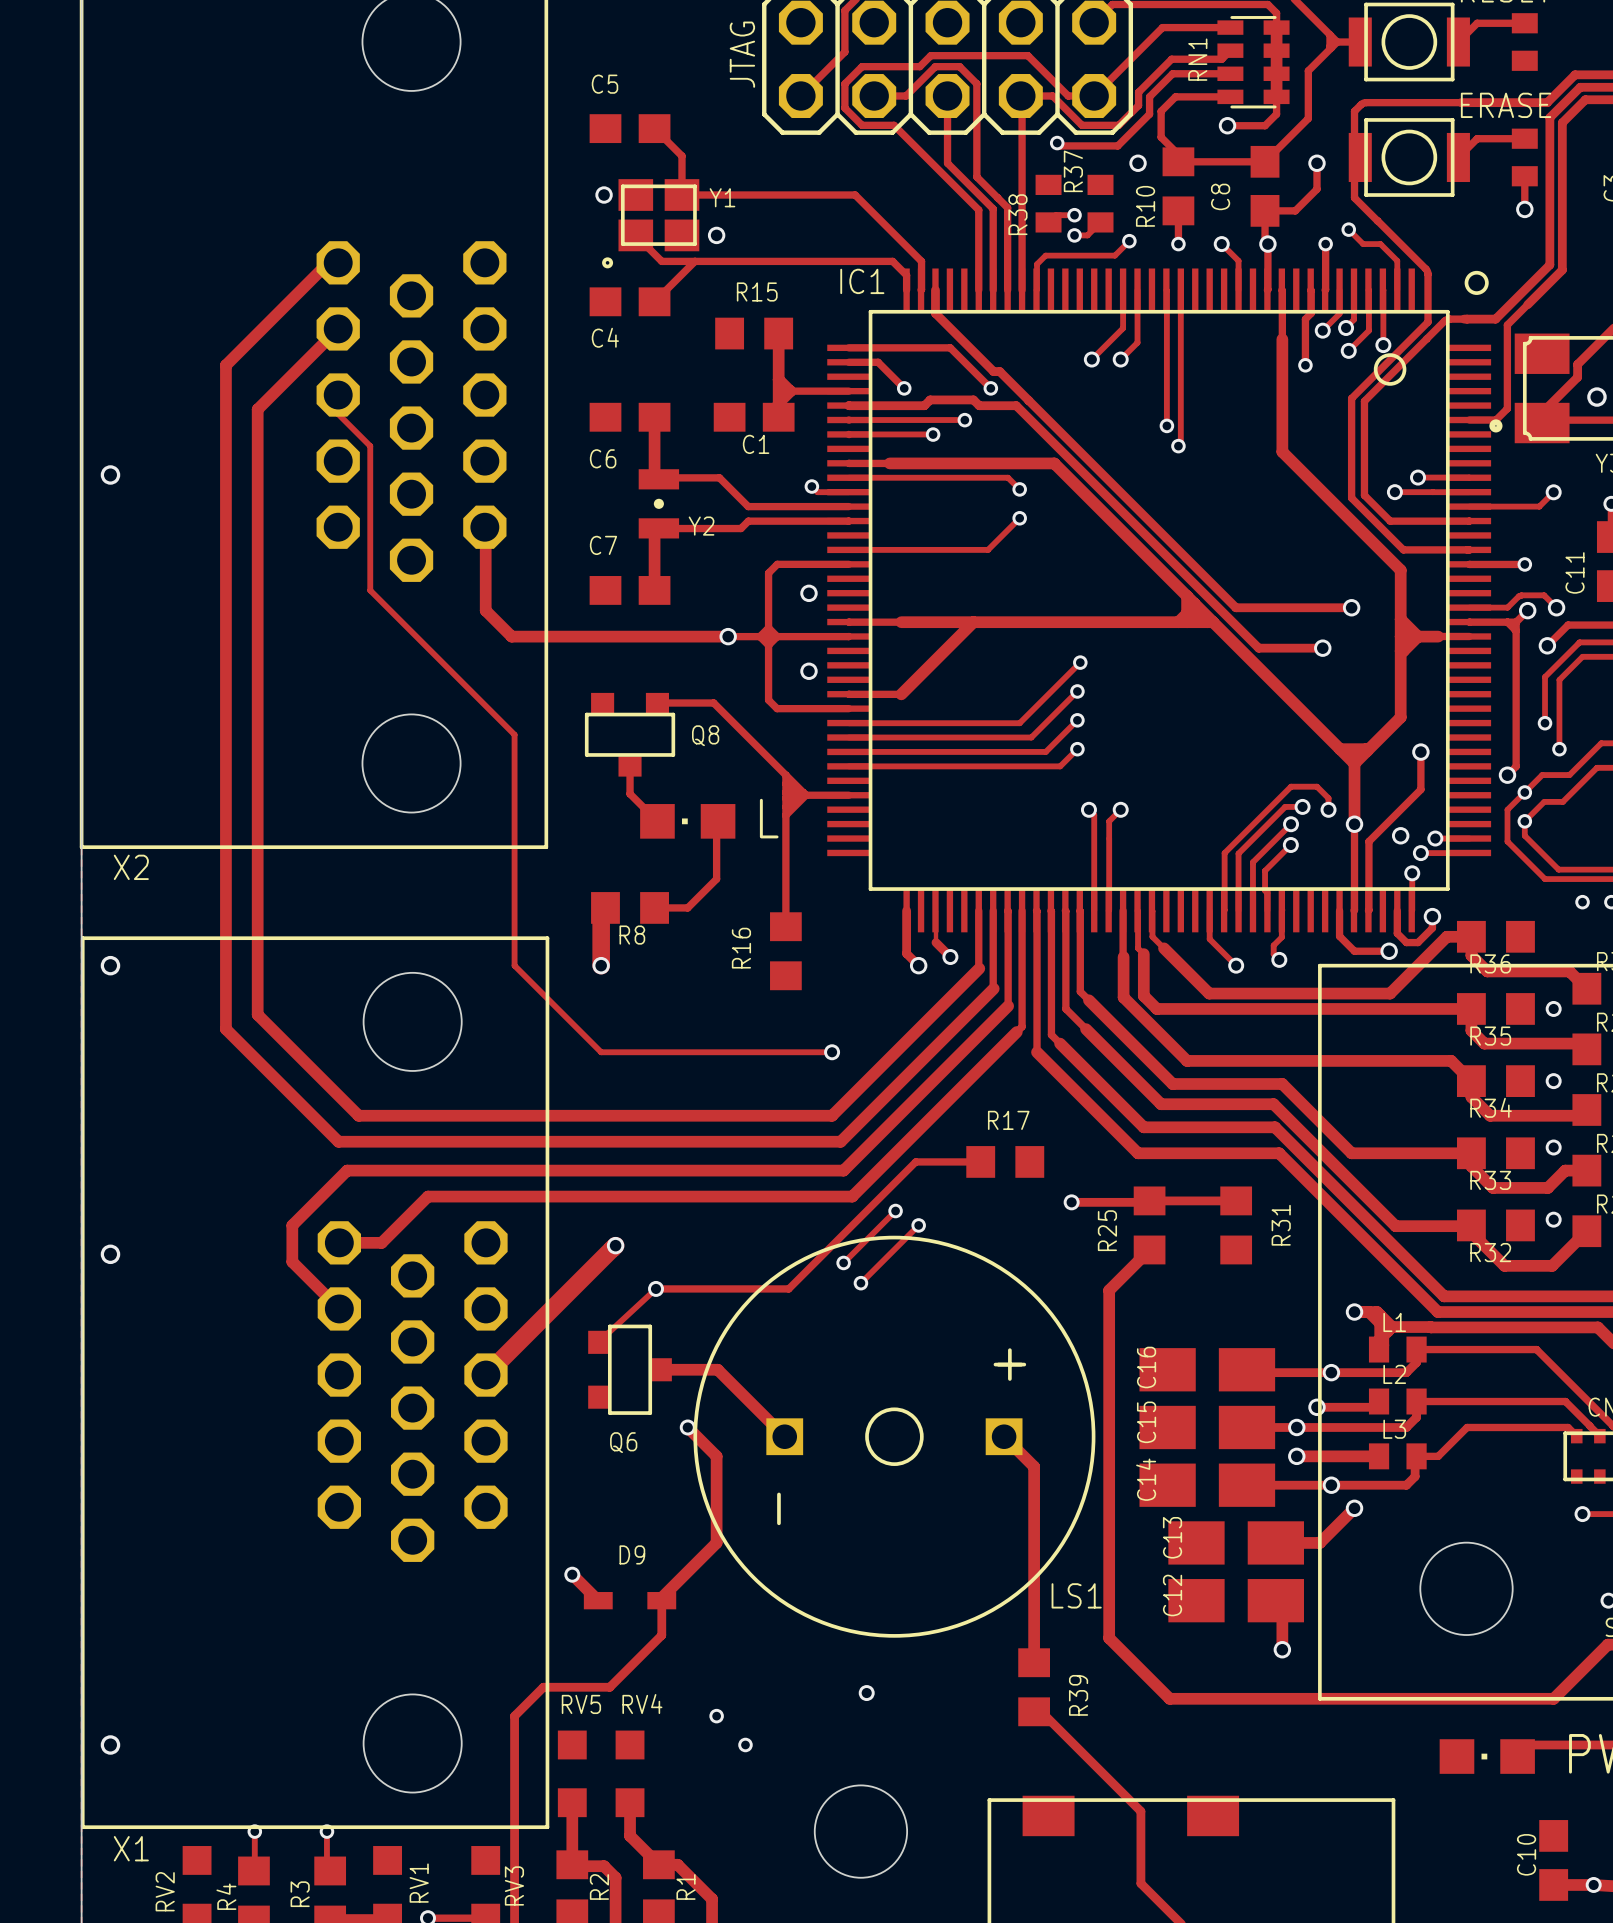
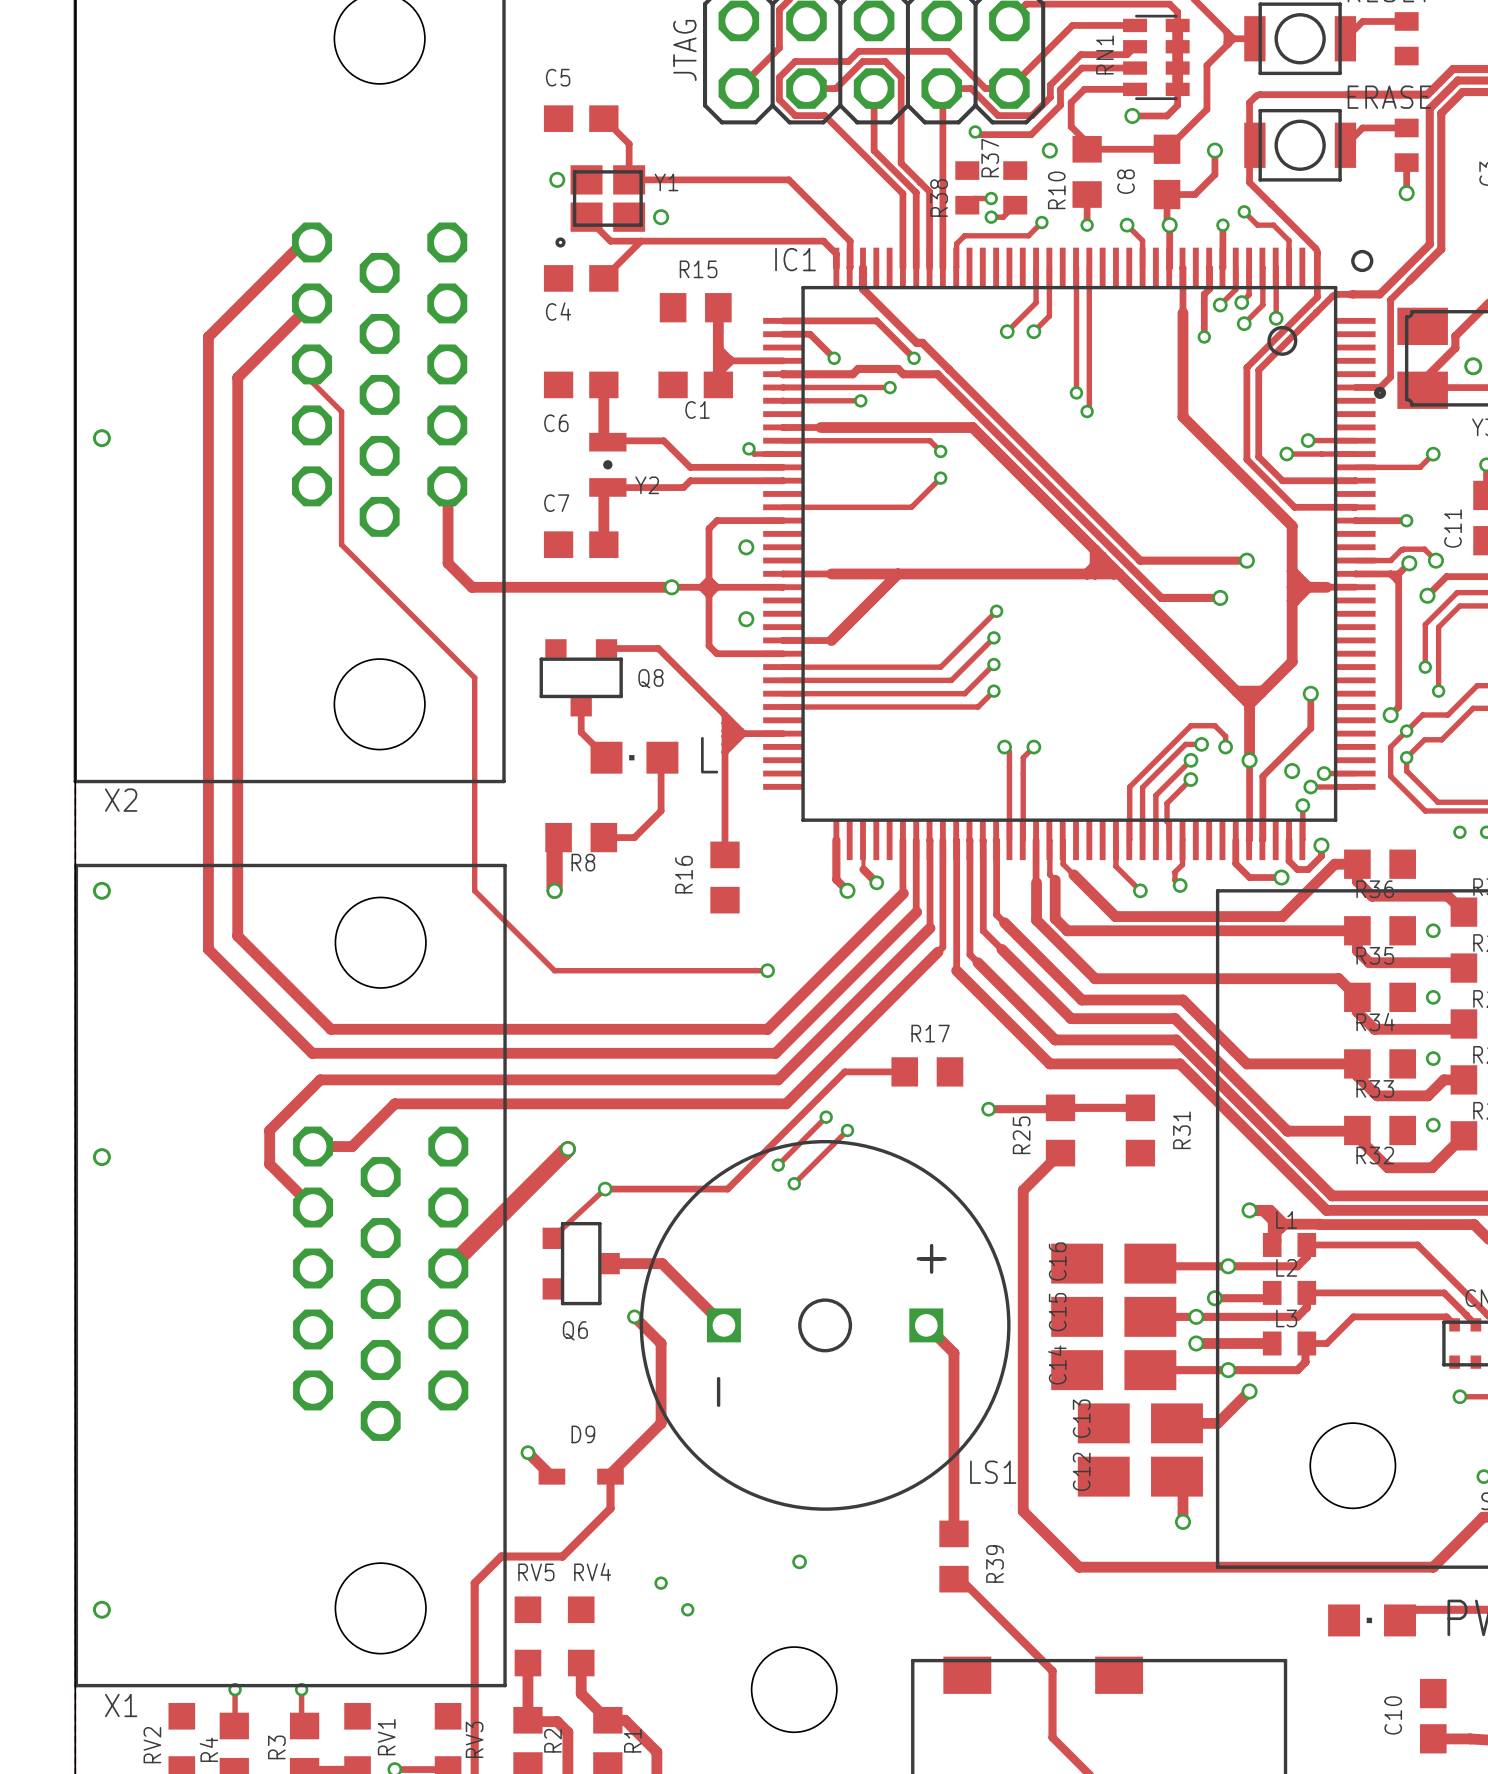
C10 name: C10 (1526, 1854) -> none
text: none -> C10 (1393, 1715)
via: (1593, 1884) -> none

